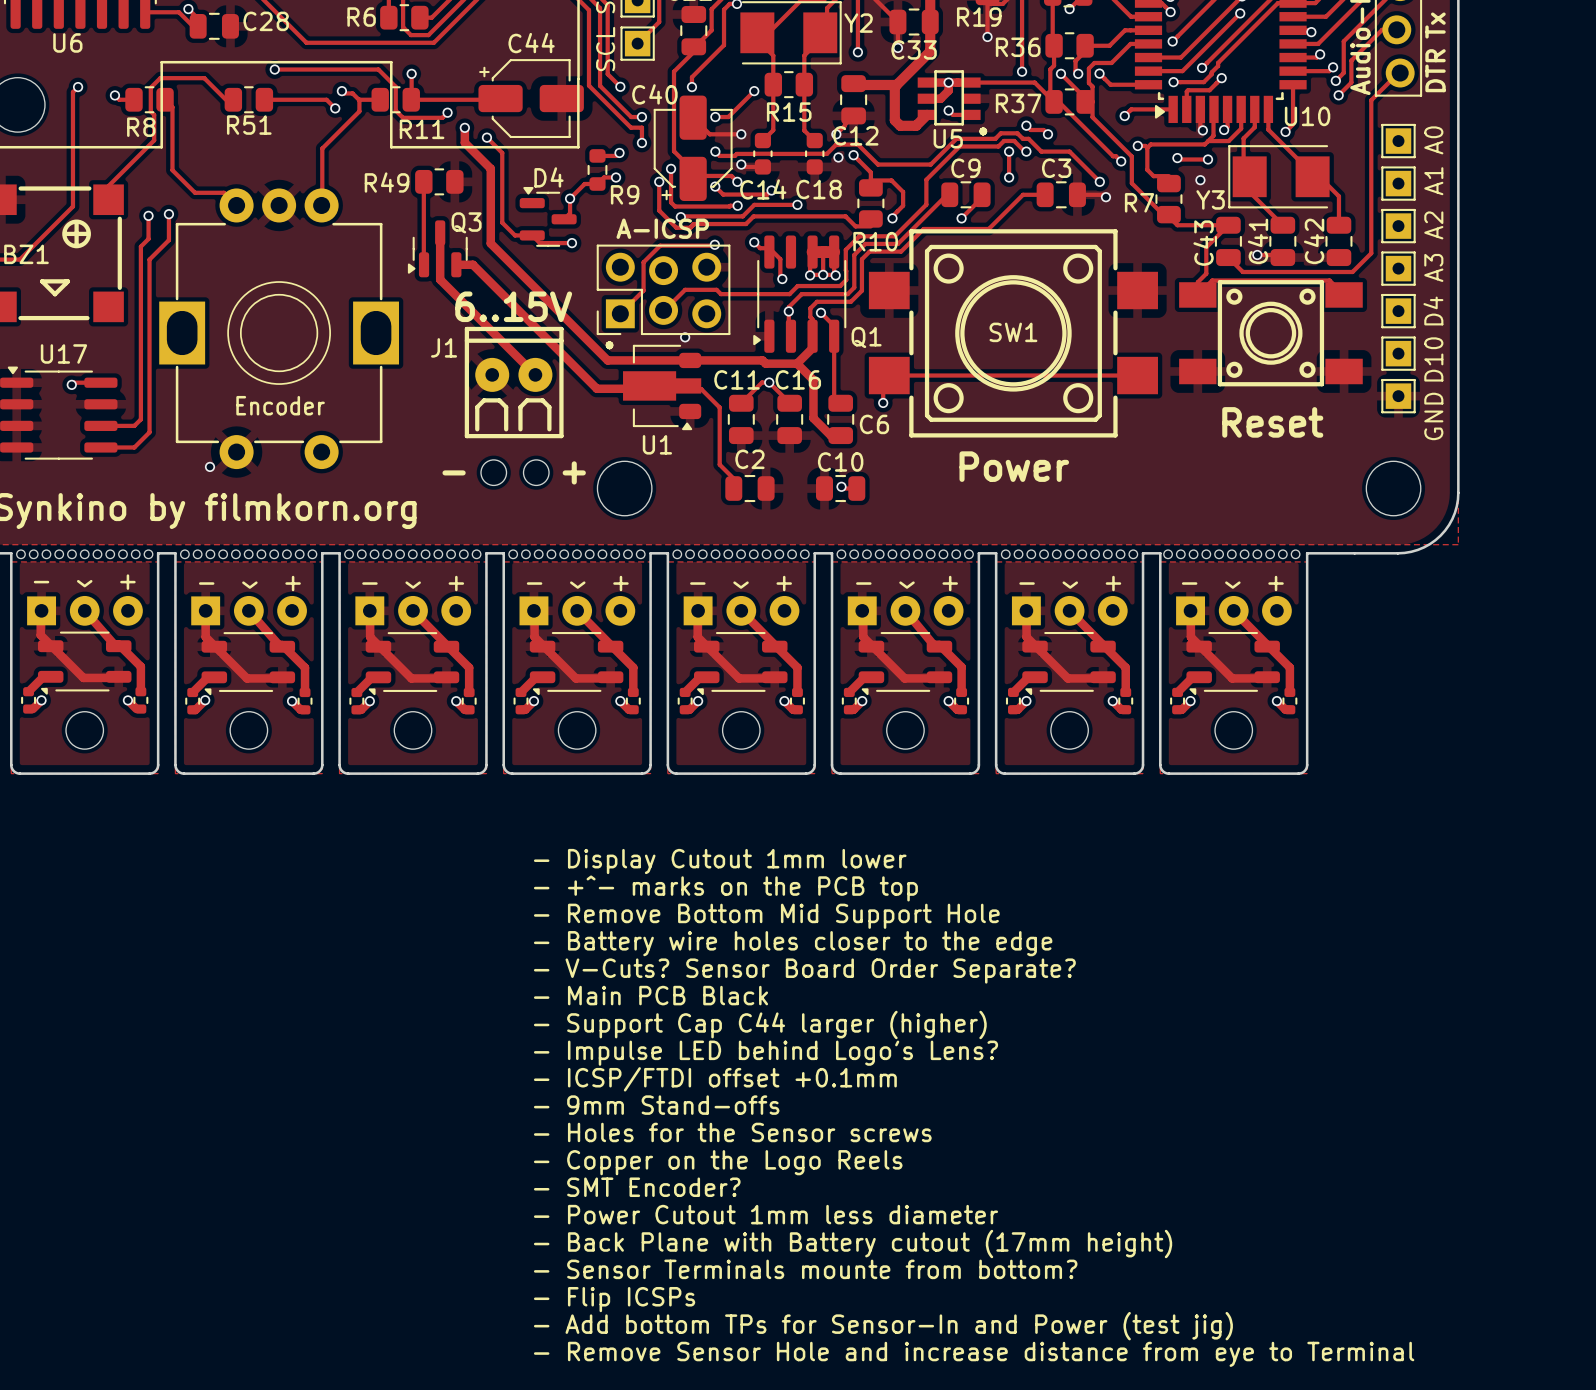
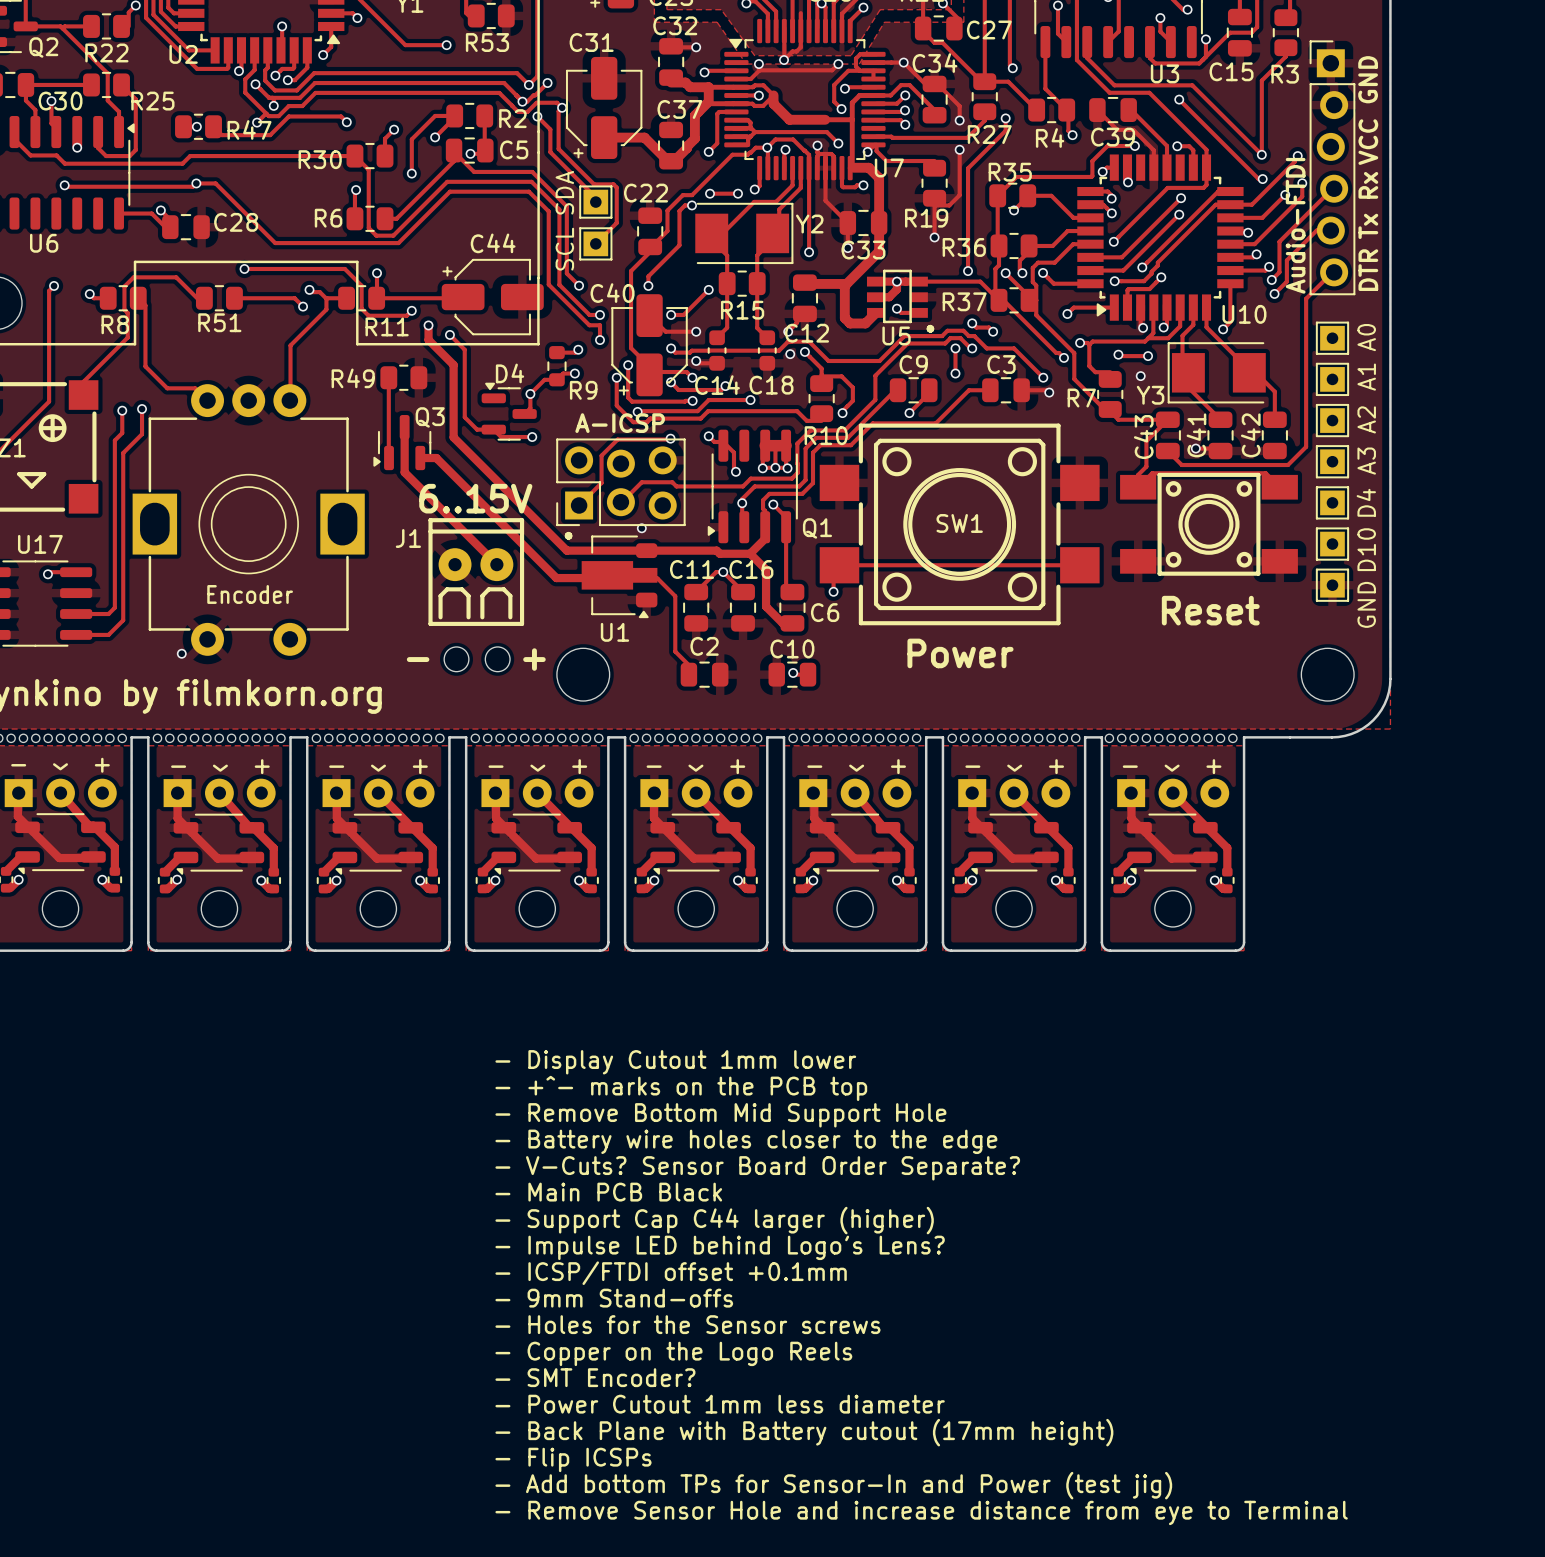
text: - Display Cutout 1mm lower (720, 861) -> none
text: - +^- marks on the PCB top (725, 888) -> - Display Cutout 1mm lower (675, 1062)
text: - Remove Bottom Mid Support Hole (766, 916) -> - +^- marks on the PCB top (681, 1088)
text: - Battery wire holes closer to the edge (793, 943) -> - Remove Bottom Mid Support Hole (720, 1115)
text: - V-Cuts? Sensor Board Order Separate? (804, 971) -> - Battery wire holes closer to the edge (746, 1141)
text: - Main PCB Black (651, 995) -> - V-Cuts? Sensor Board Order Separate? (757, 1168)
text: - Support Cap C44 larger (higher) (760, 1024) -> - Main PCB Black (608, 1192)
text: - Impulse LED behind Logo's Lens? (766, 1053) -> - Support Cap C44 larger (higher) (714, 1220)
text: - ICSP/FTDI offset +0.1mm (715, 1079) -> - Impulse LED behind Logo's Lens? (720, 1247)
text: - 9mm Stand-offs (656, 1105) -> - ICSP/FTDI offset +0.1mm (671, 1273)
text: - Holes for the Sensor screws (732, 1132) -> - 9mm Stand-offs (614, 1298)
text: - Copper on the Logo Reels (718, 1162) -> - Holes for the Sensor screws (687, 1324)
text: - SMT Encoder? (637, 1187) -> - Copper on the Logo Reels (673, 1353)
text: - Power Cutout 1mm less diameter (766, 1214) -> - SMT Encoder? (595, 1377)
text: - Back Plane with Battery cutout (17mm height) (853, 1244) -> - Power Cutout 1mm less diameter (720, 1404)
text: - Sensor Terminals mounte from bottom? (805, 1269) -> - Back Plane with Battery cutout (17mm height) (804, 1432)

